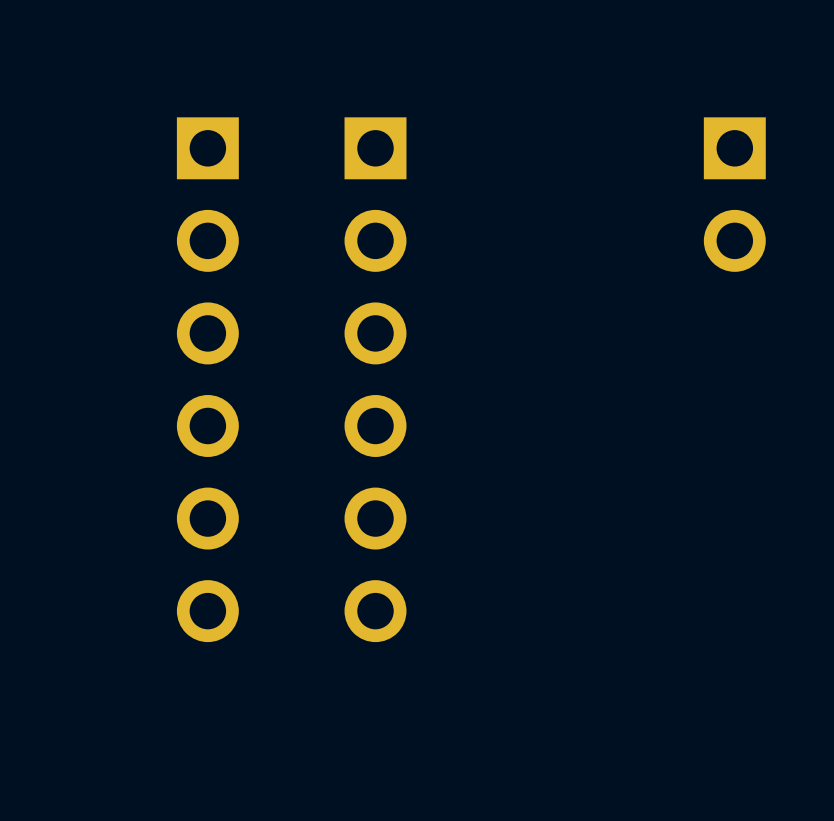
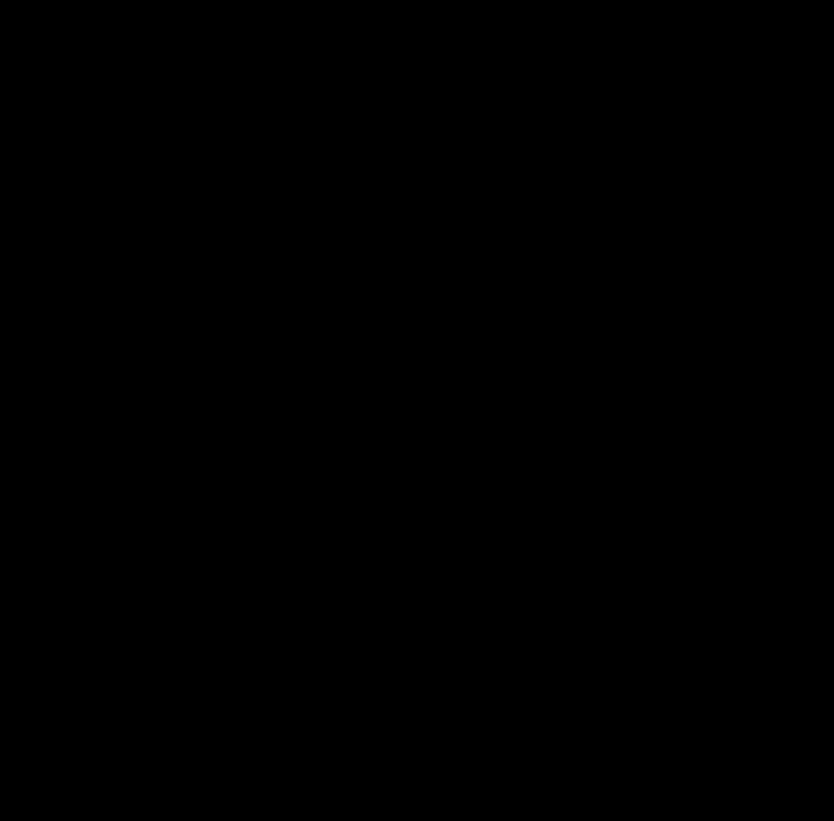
part: (734, 194) -> none
part: (207, 379) -> none
part: (375, 379) -> none

